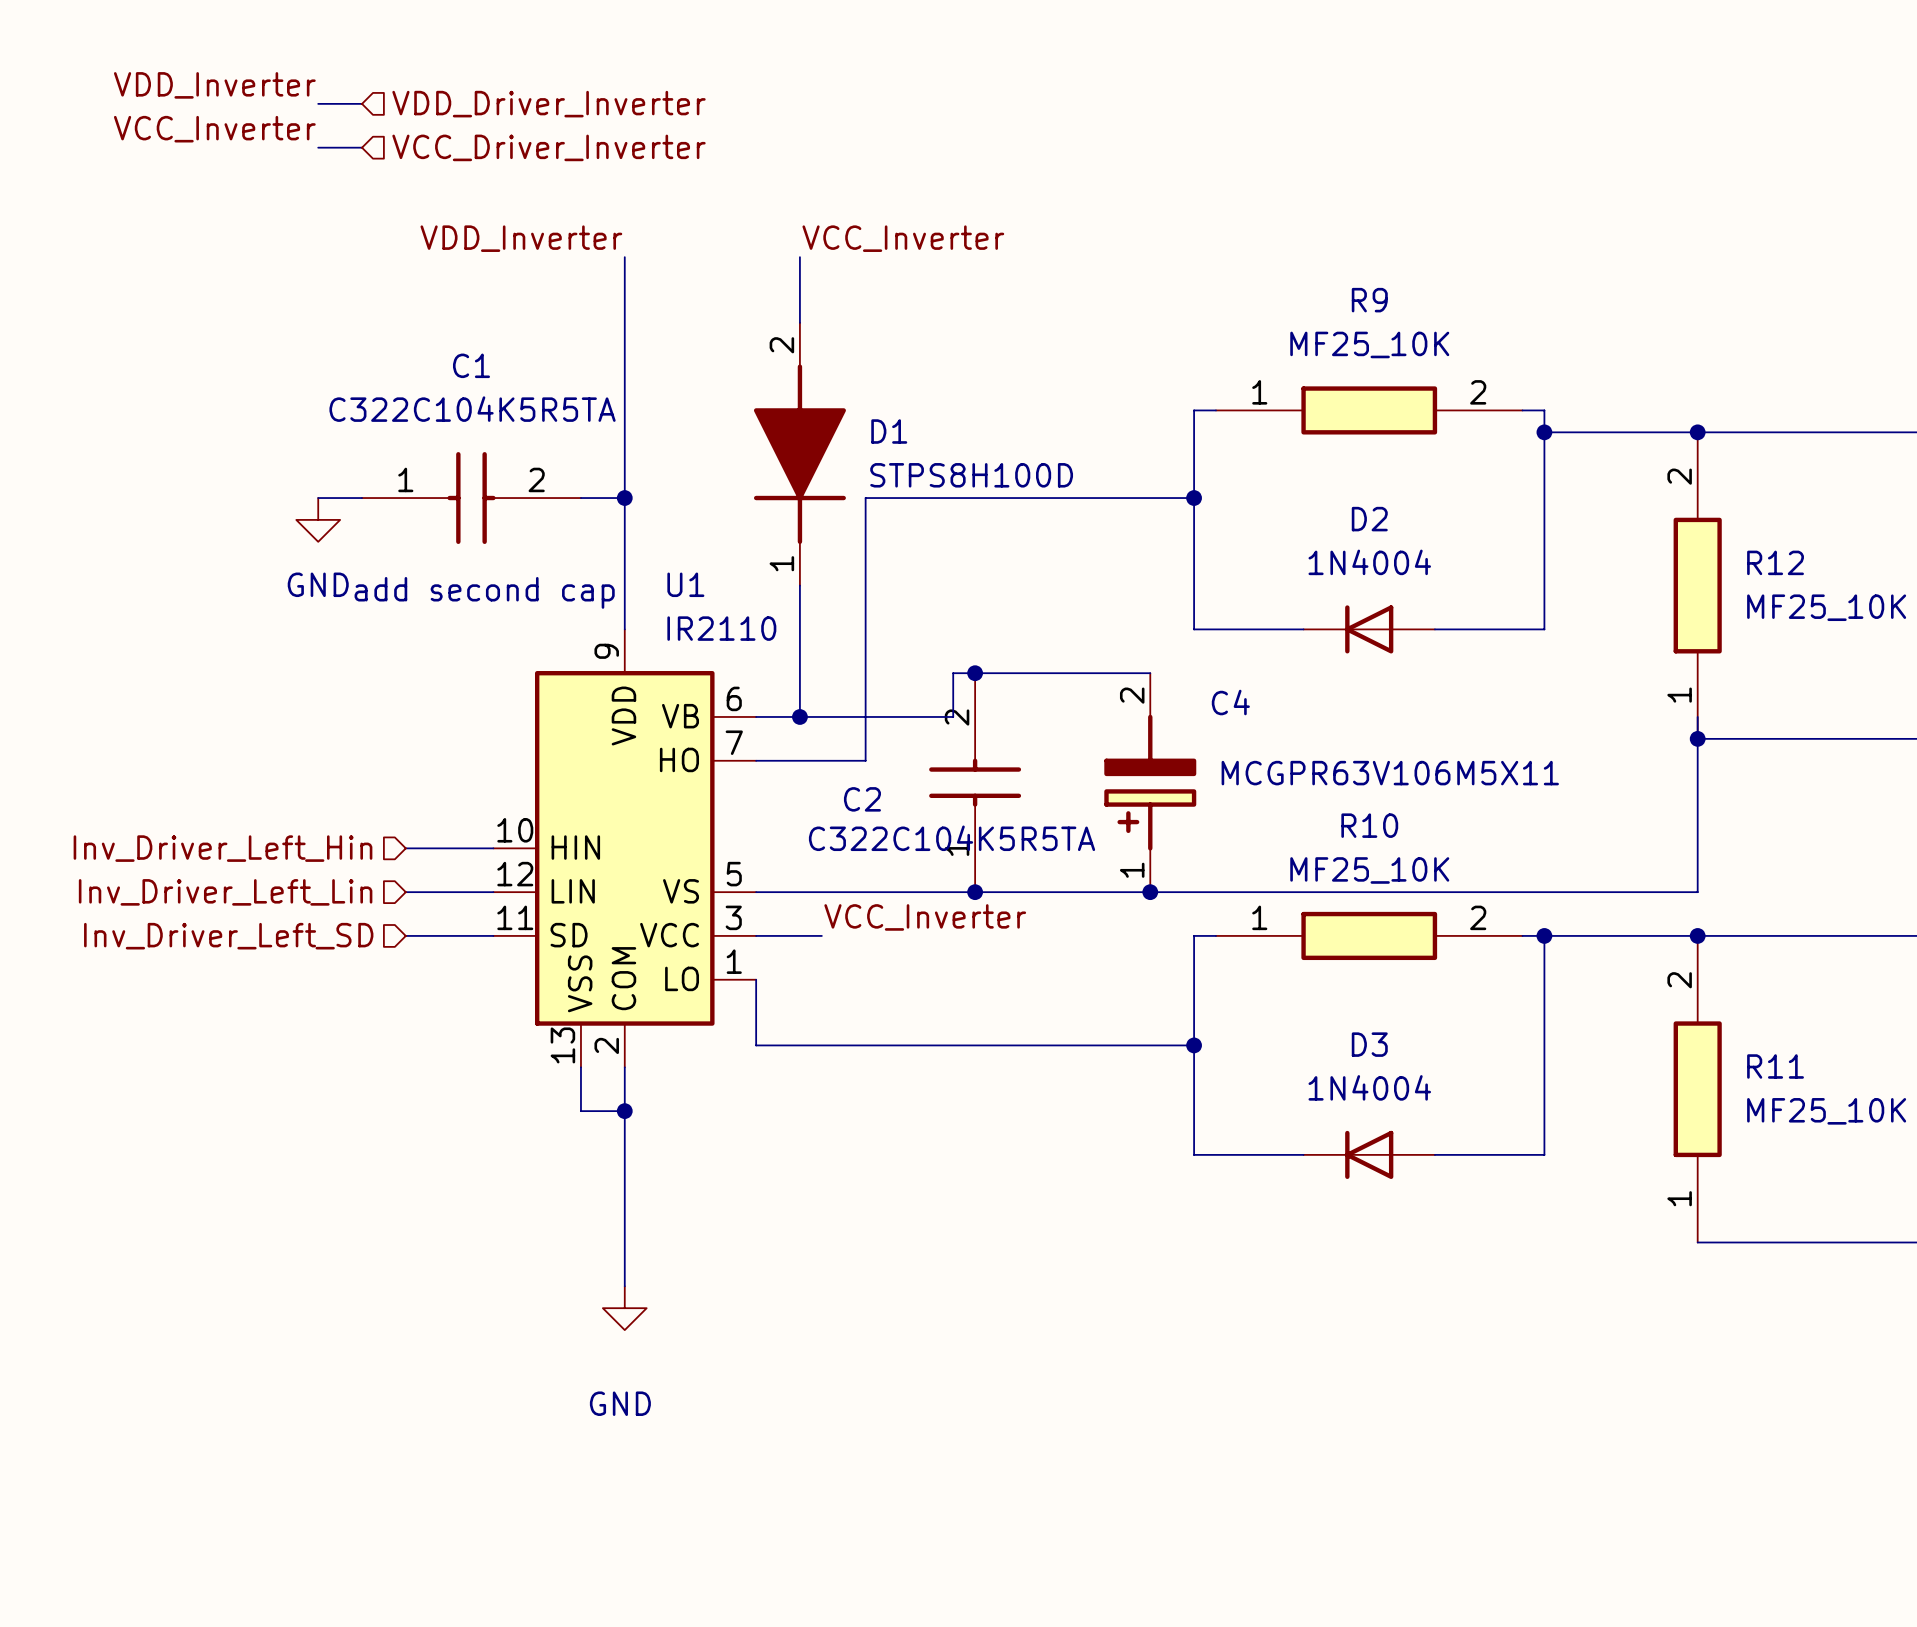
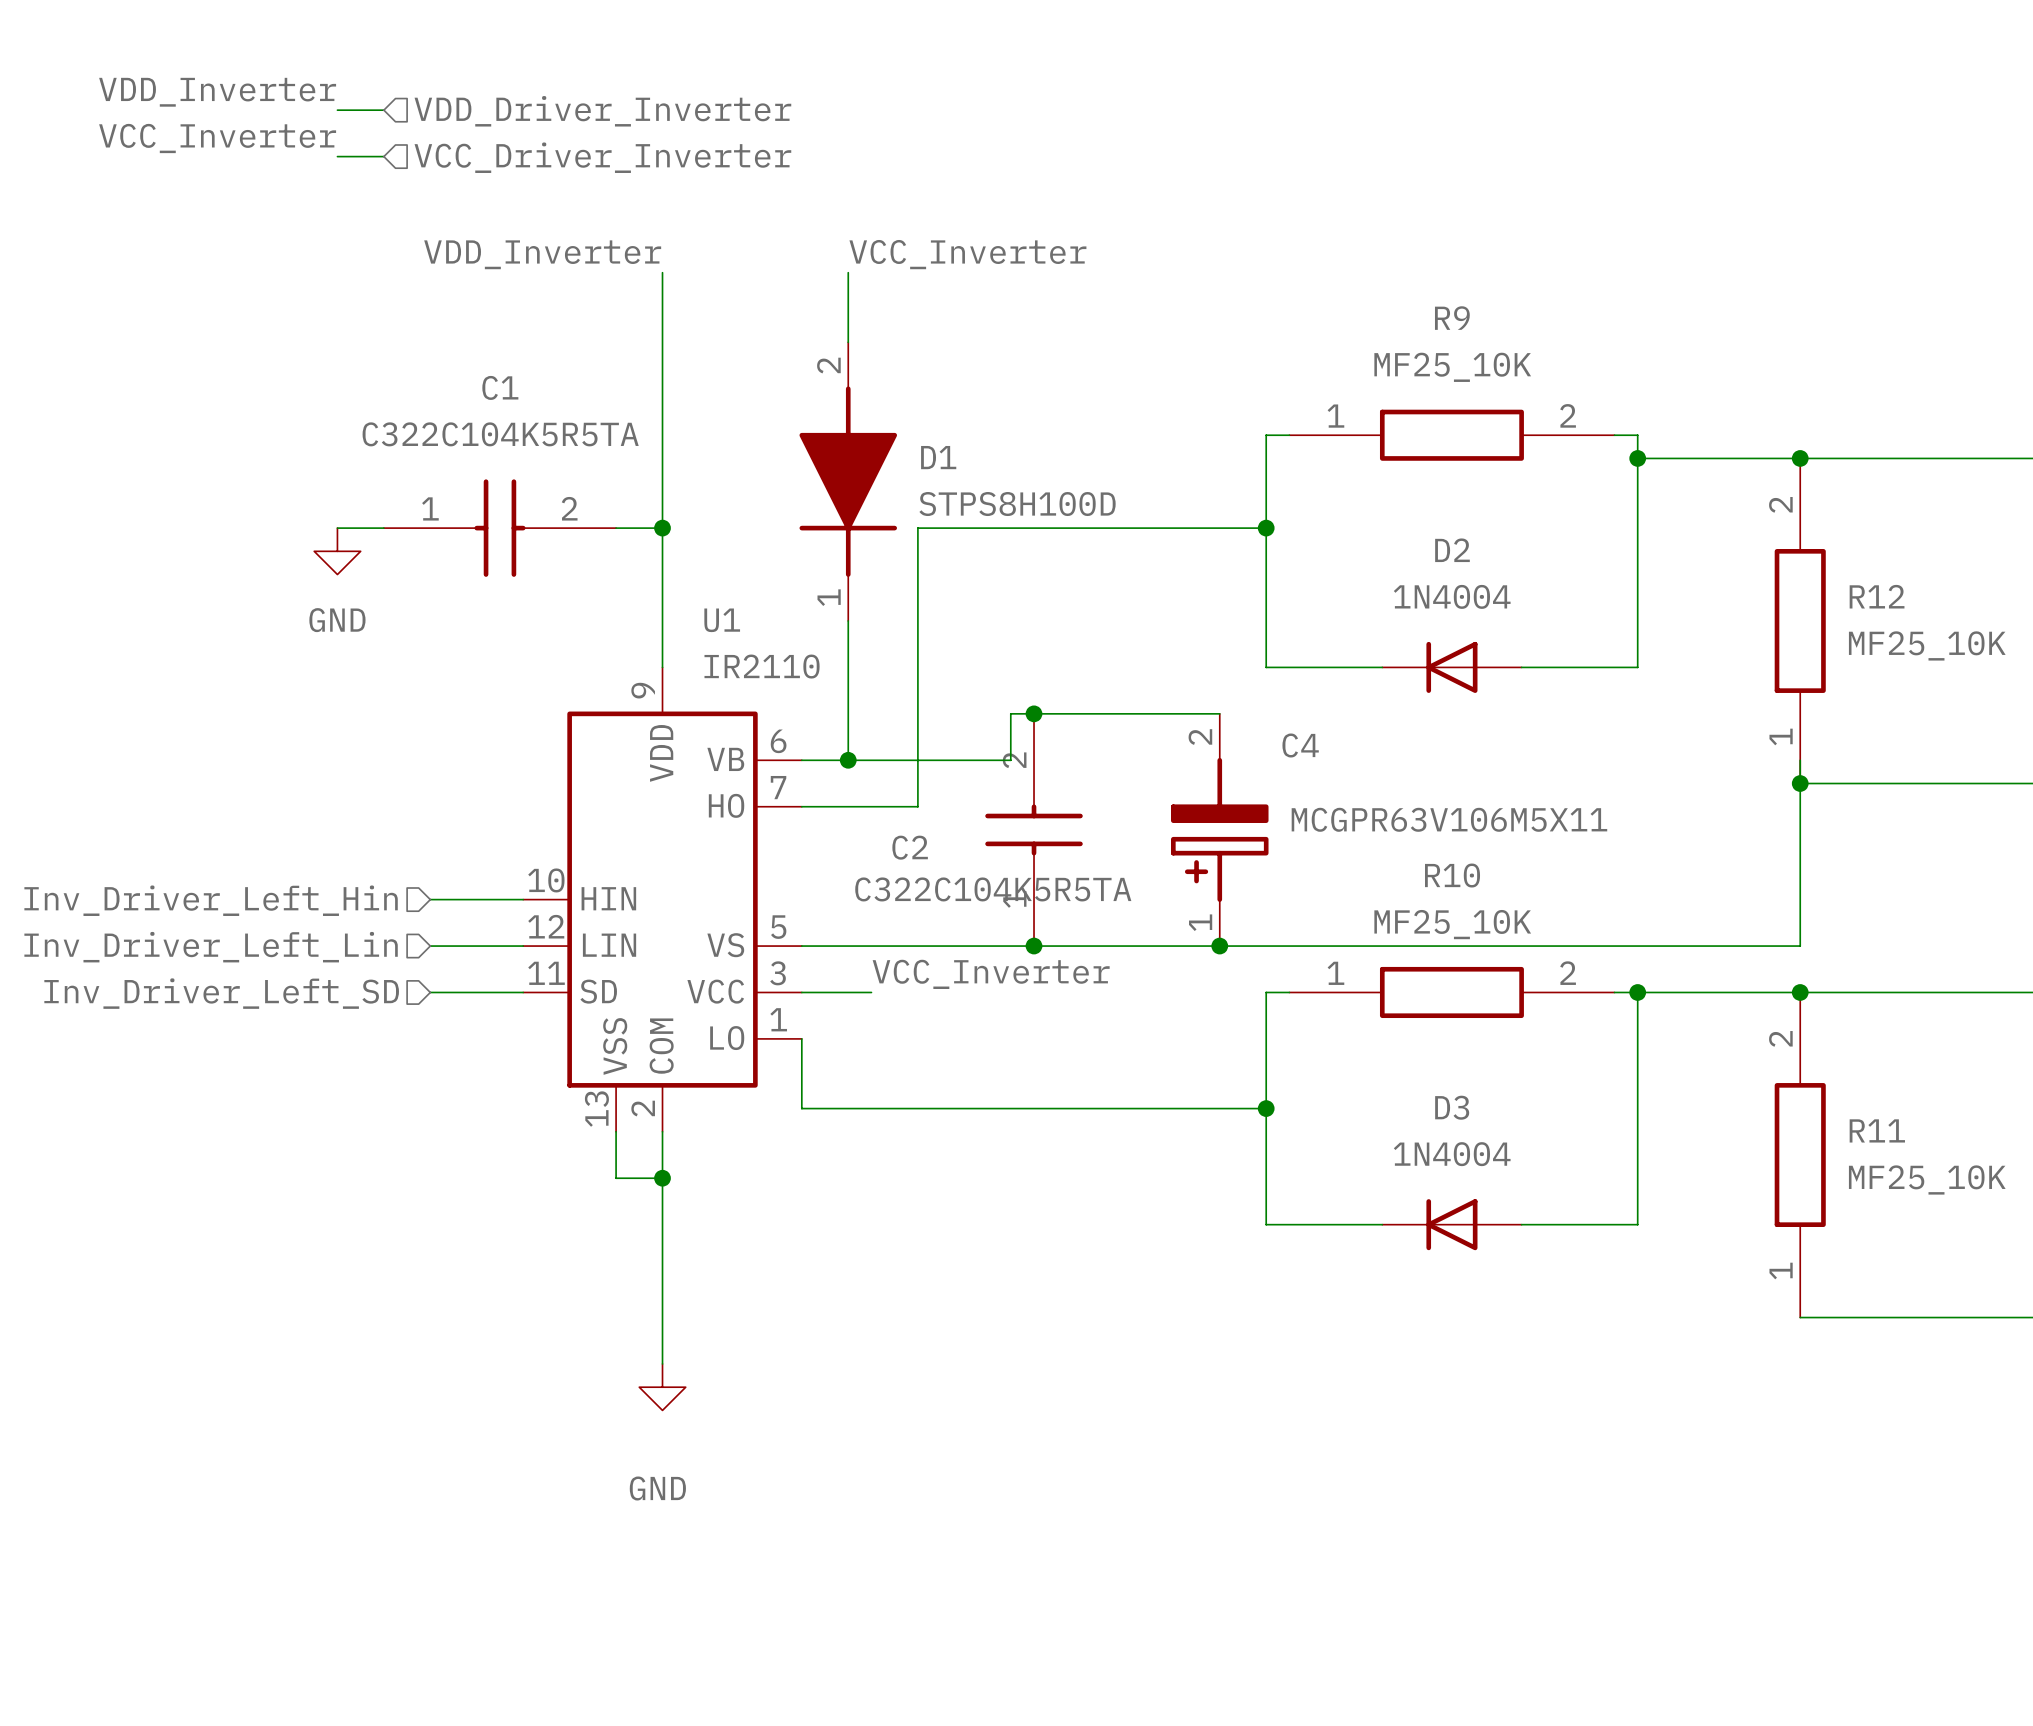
text: add second cap (484, 592) -> none

